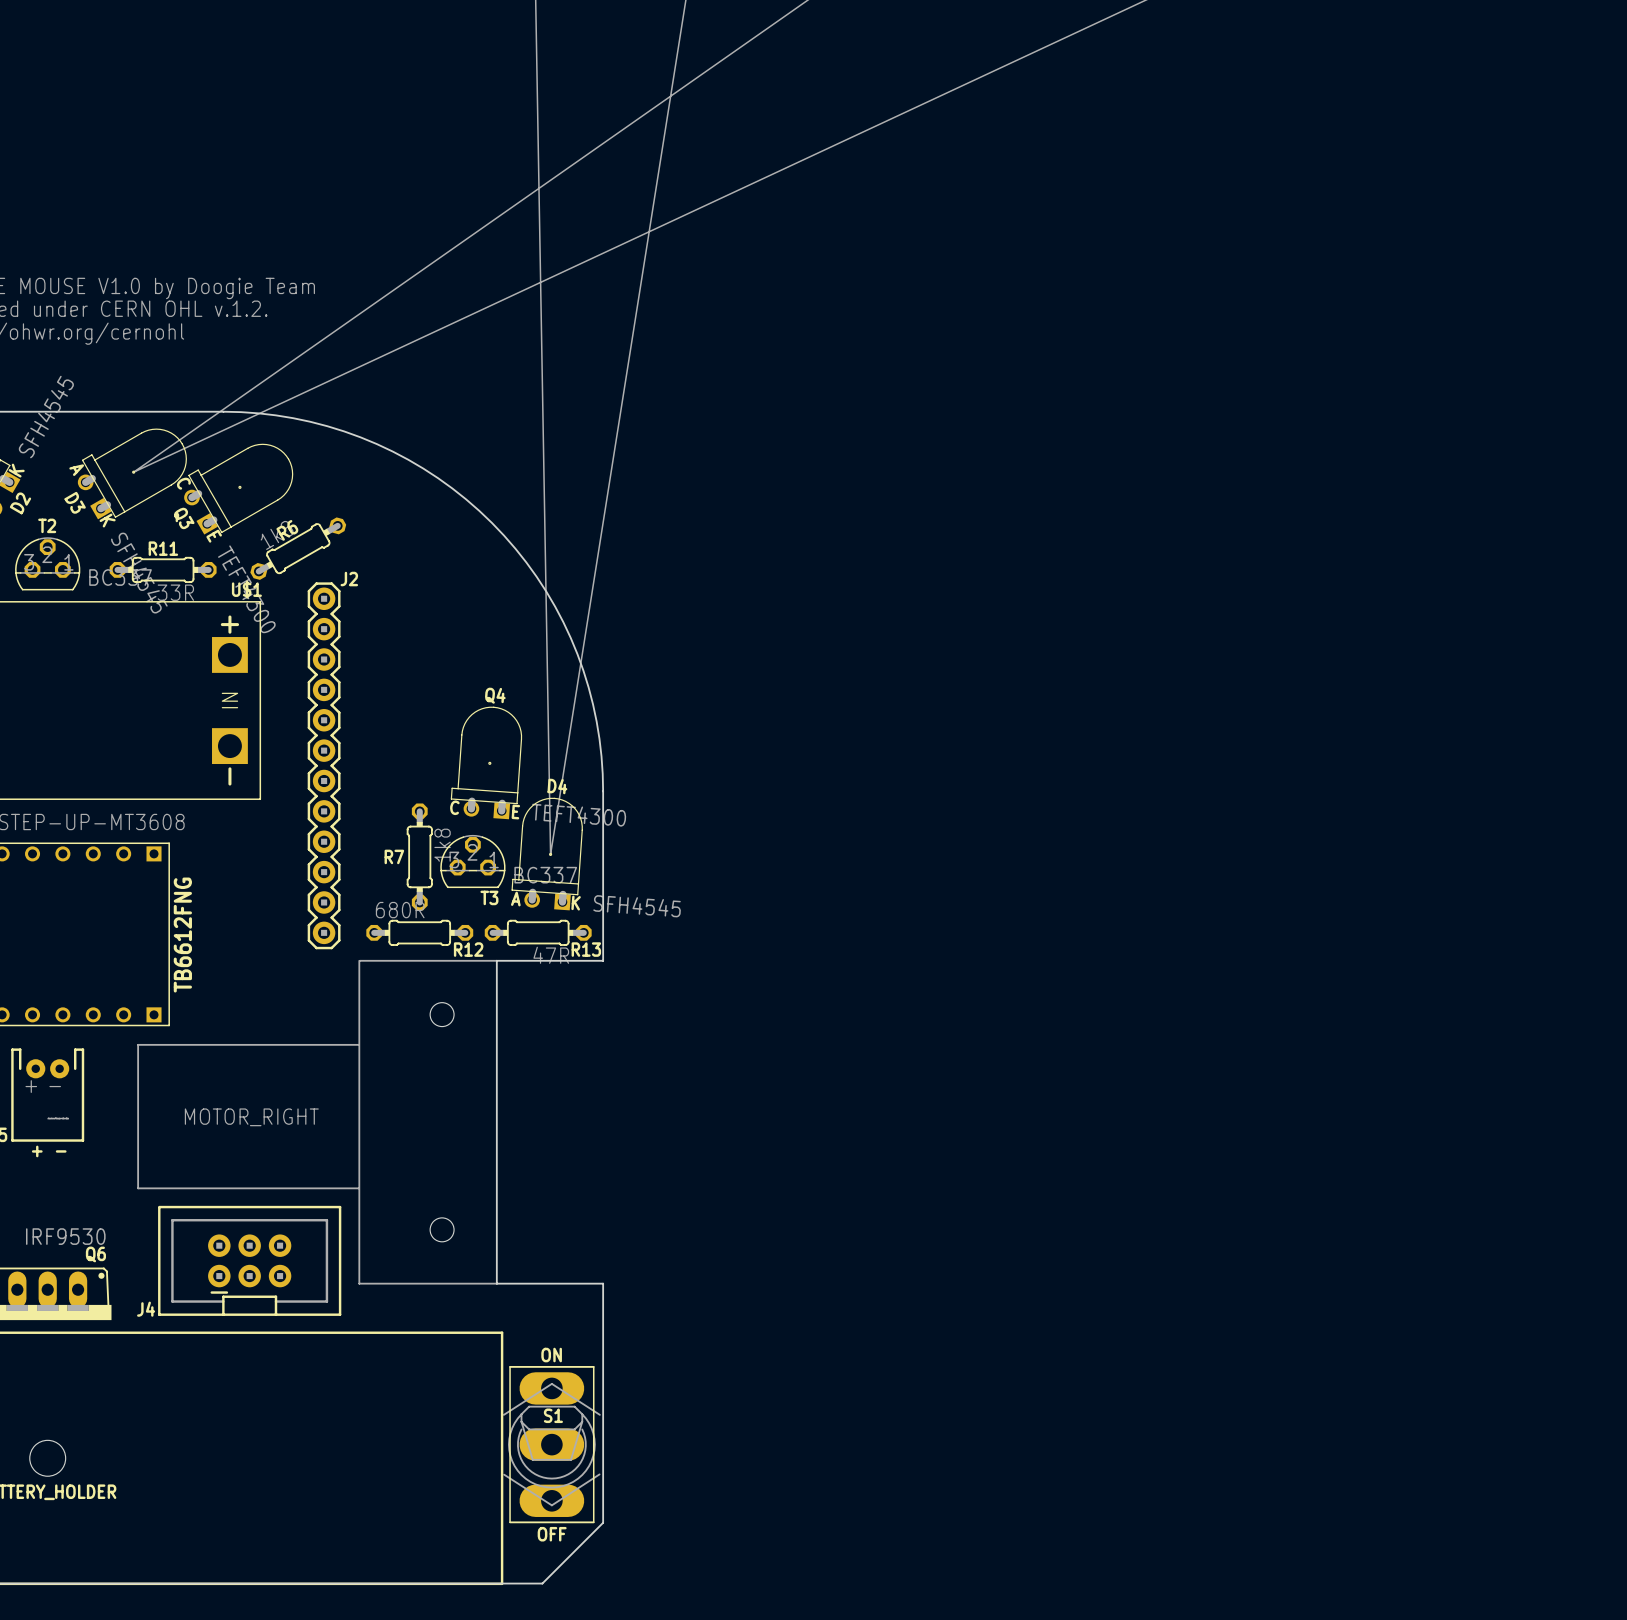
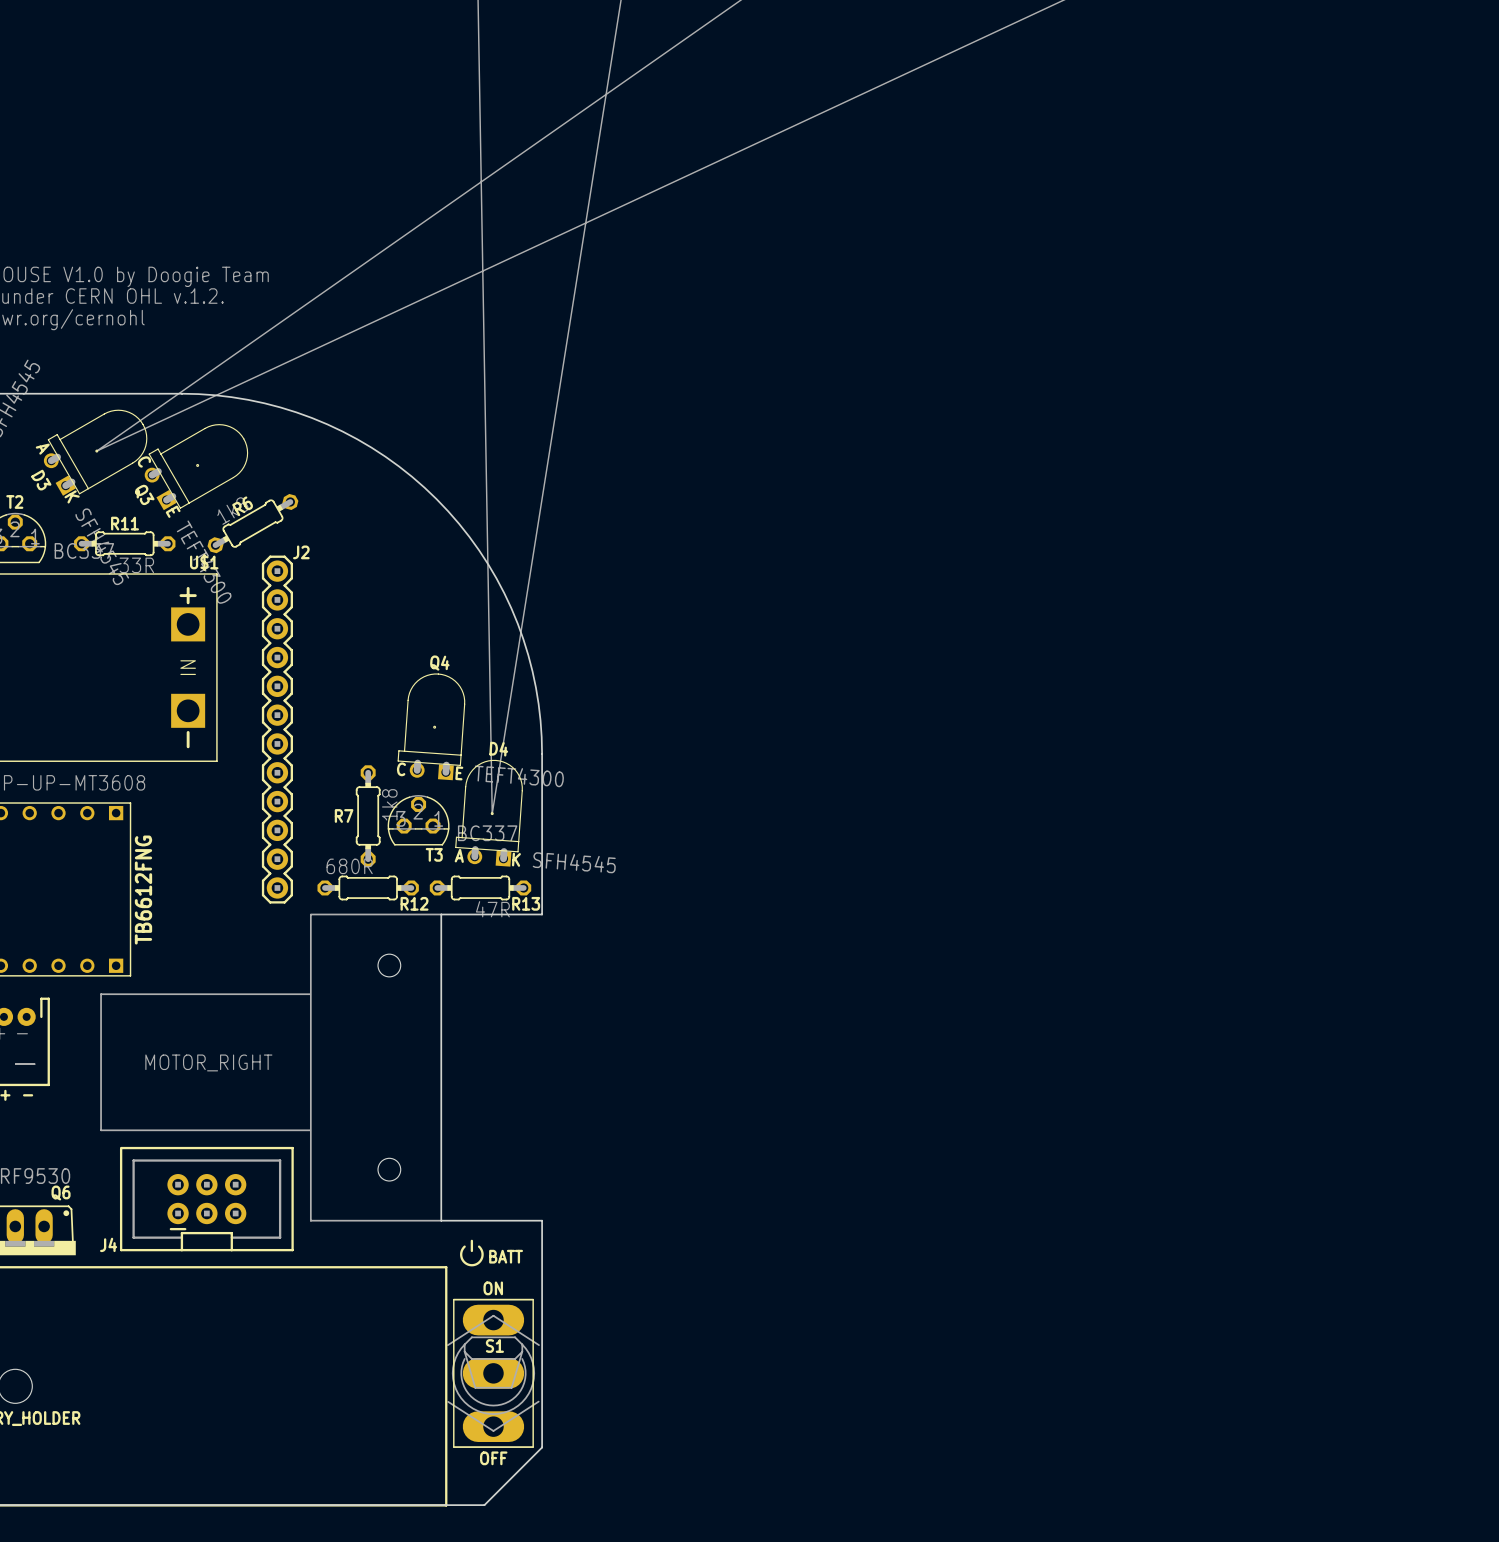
line: none -> (471, 1240) (471, 1250)
line: none -> (464, 1246) (461, 1252) (462, 1259) (466, 1263) (471, 1265) (477, 1263) (481, 1259) (482, 1252) (479, 1246)
text: none -> BATT (506, 1256)

